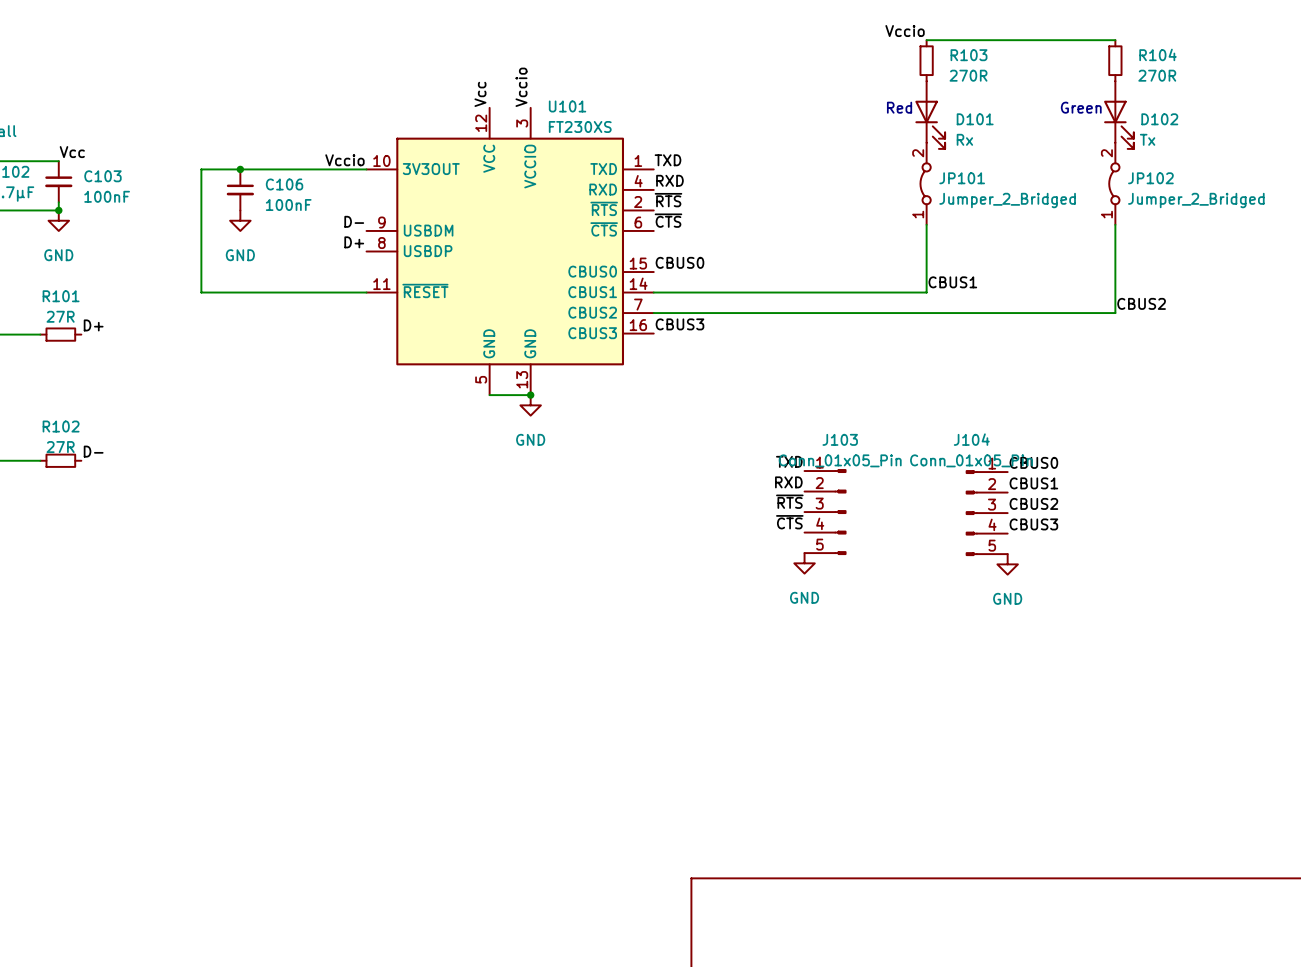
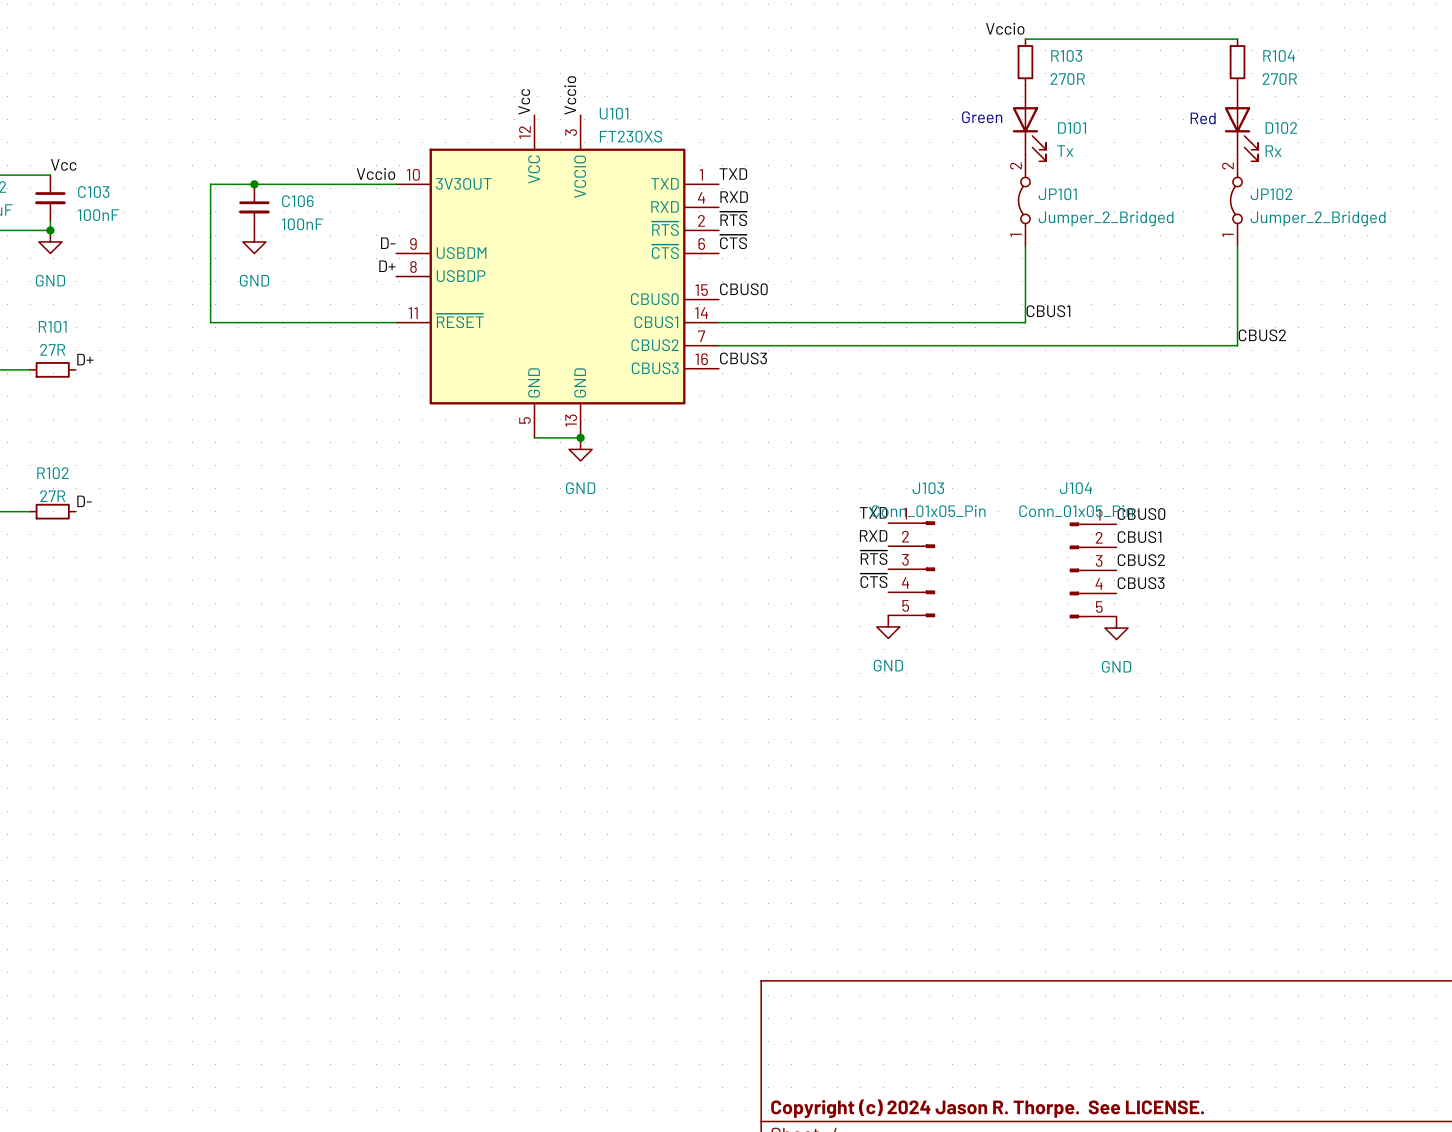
text position: Red (899, 107) -> Red (1203, 118)
text position: Green (1081, 107) -> Green (982, 117)
D101 value: Rx (964, 139) -> Tx (1065, 151)
D102 value: Tx (1147, 139) -> Rx (1273, 151)

